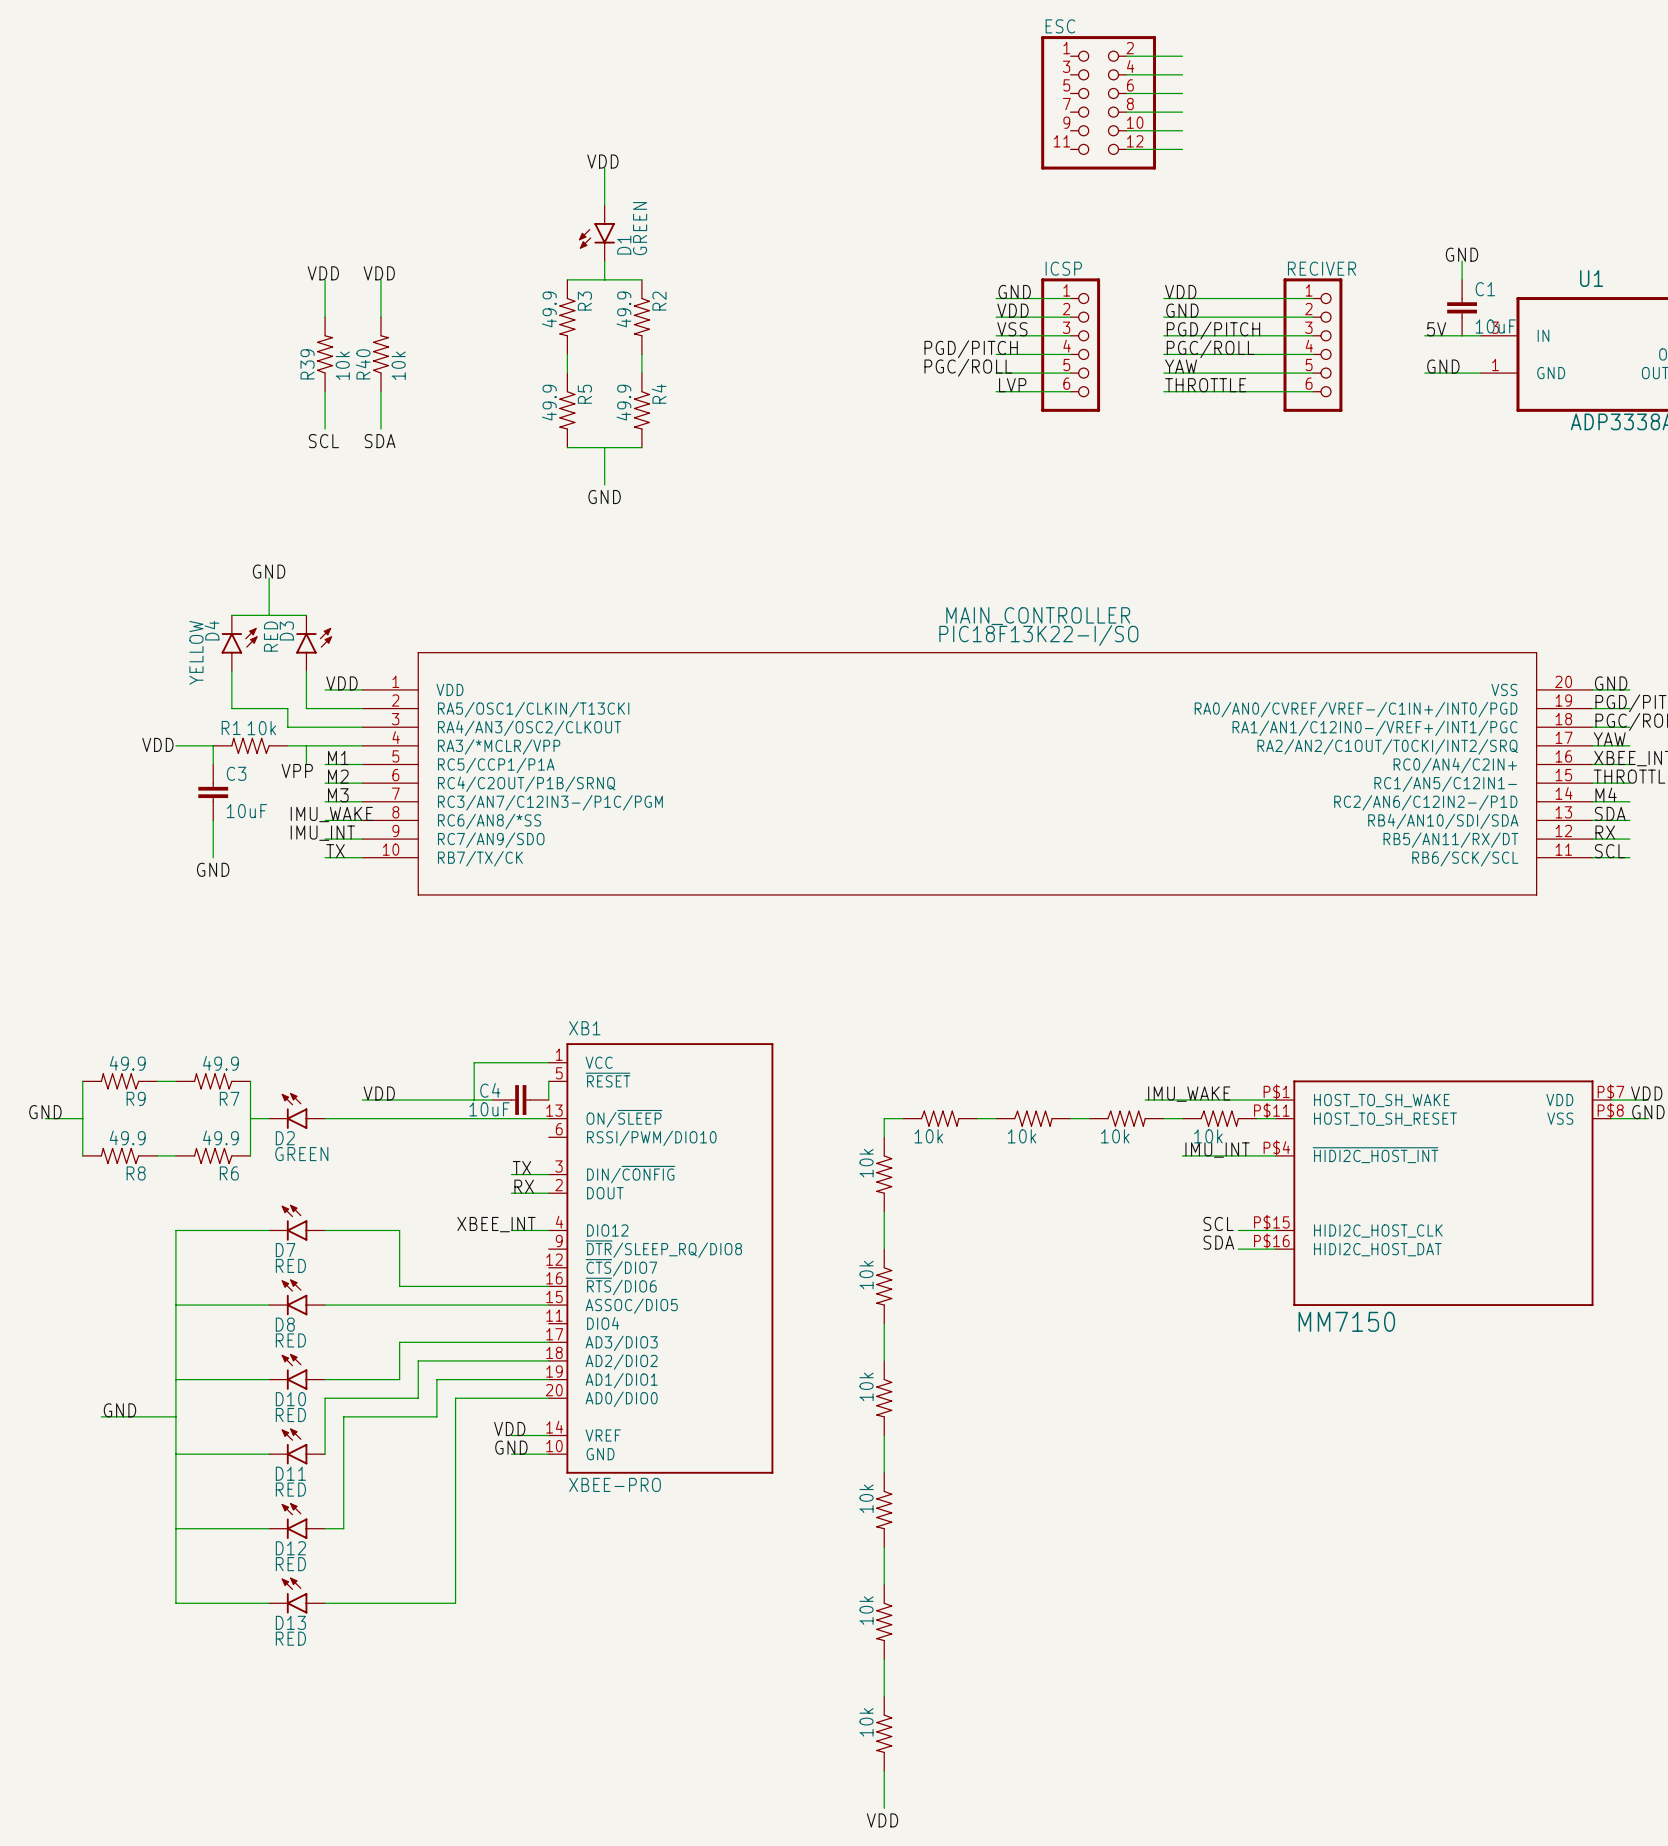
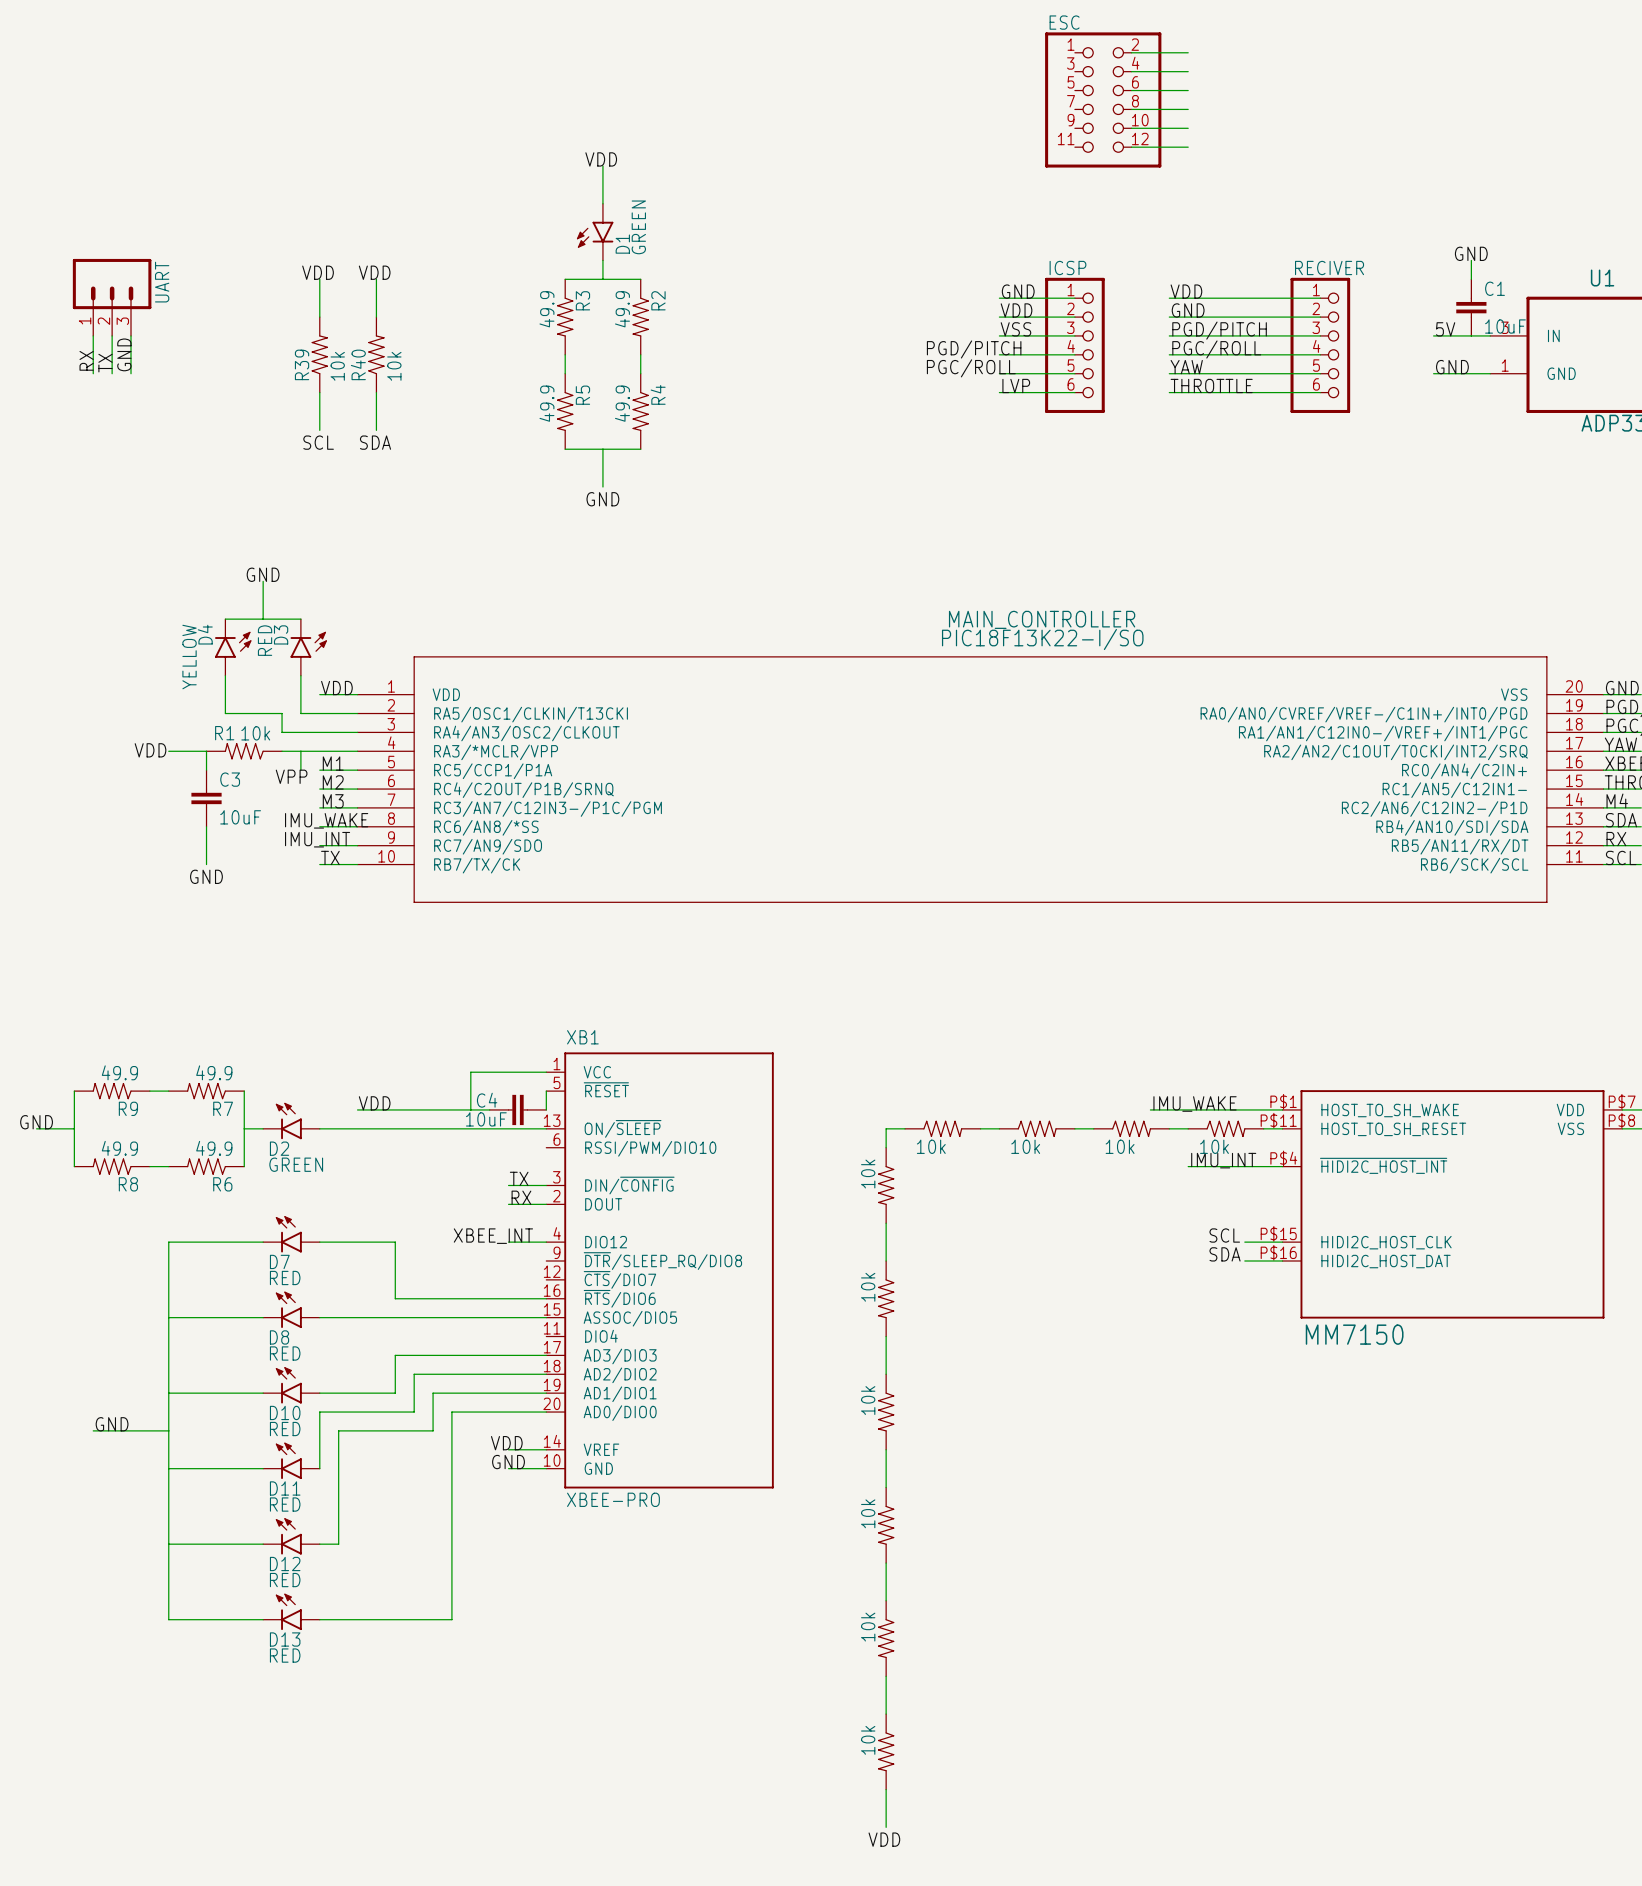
UART: none -> (112, 297)
wire: none -> (93, 335) (93, 373)
wire: none -> (112, 335) (112, 373)
wire: none -> (131, 335) (131, 373)
label: none -> GND (124, 354)
label: none -> RX (86, 360)
label: none -> TX (105, 363)

